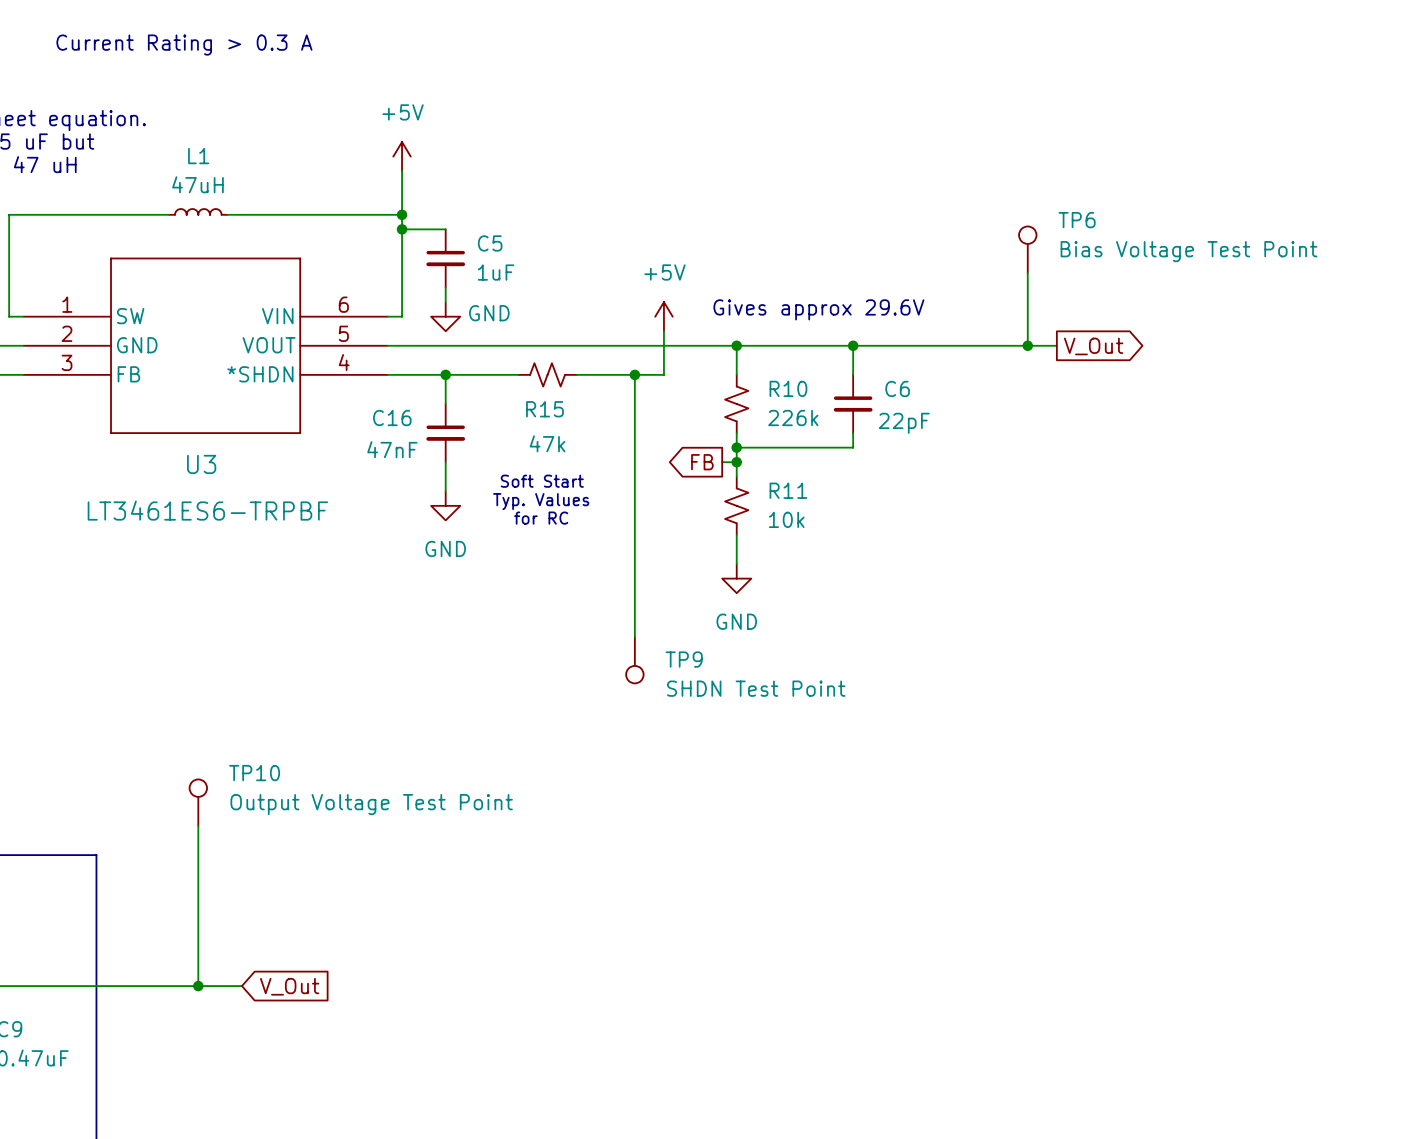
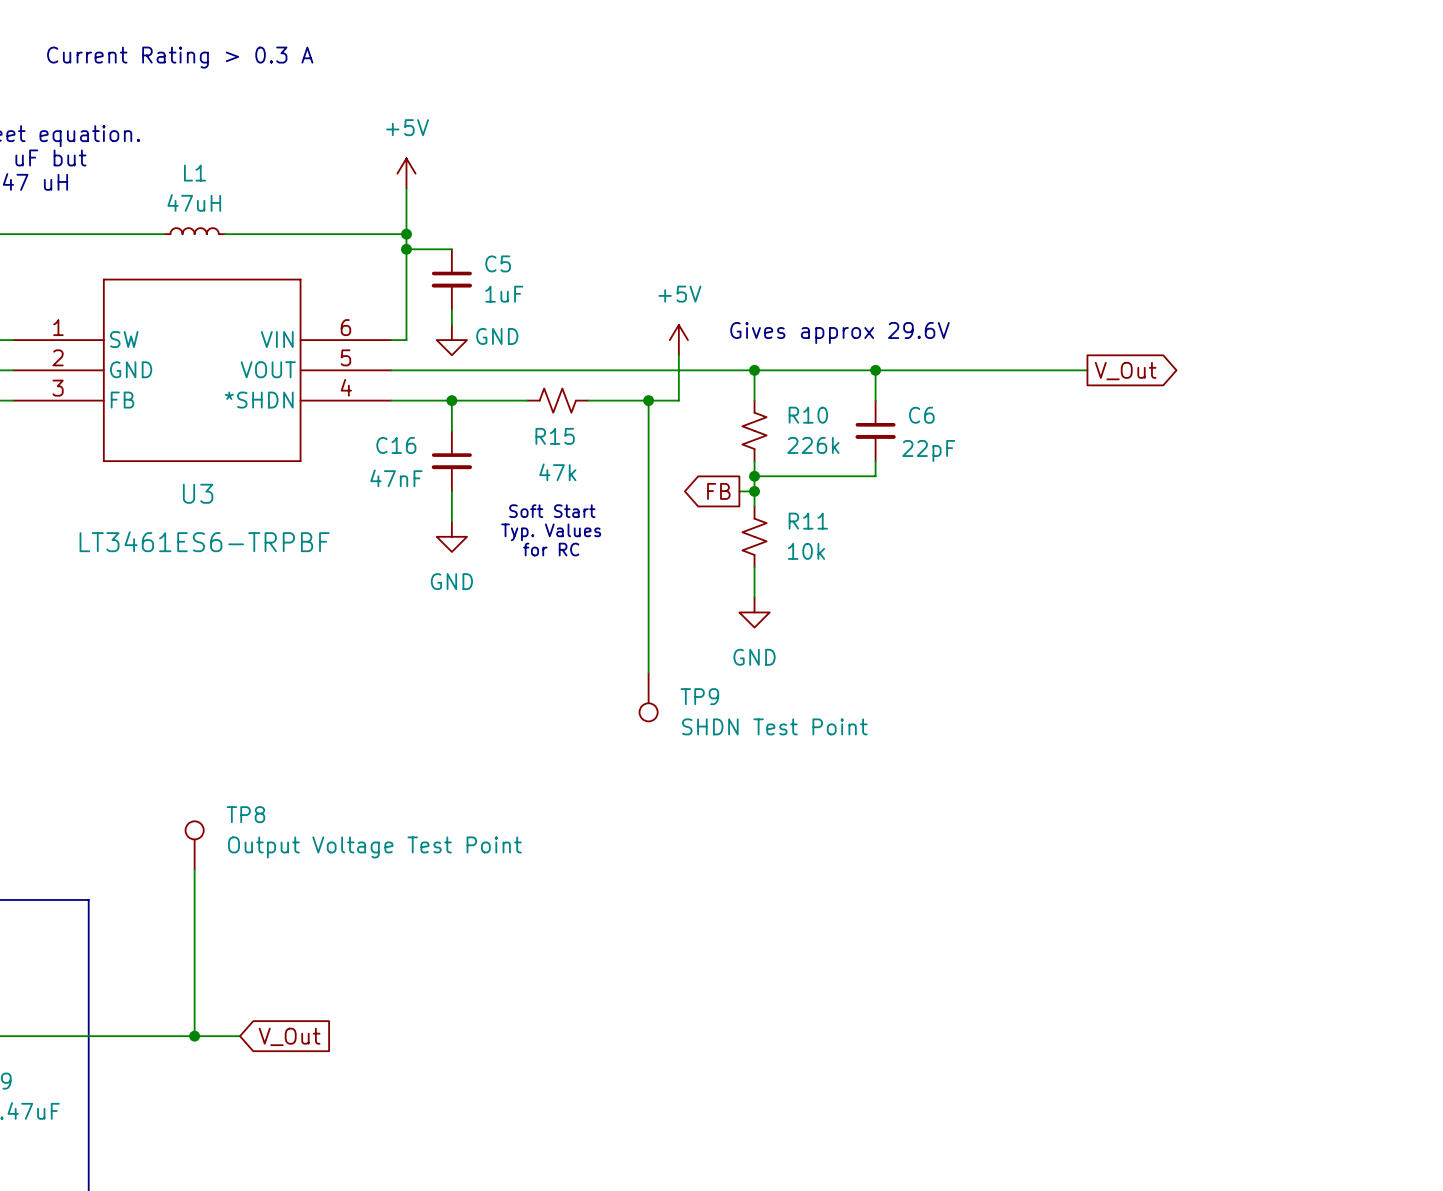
TP6: Bias Voltage Test Point (1027, 249) -> none
wire: (1027, 273) (1027, 345) -> none
junction: (1027, 345) -> none
TP10 name: TP10 (254, 773) -> TP8 (245, 814)

